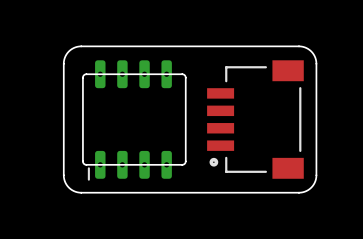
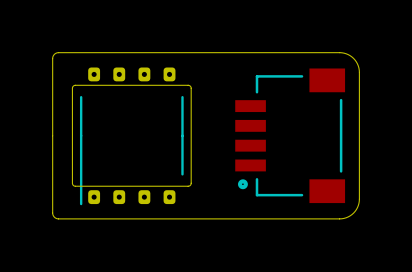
board edge: (81, 46) (73, 48) (66, 54) (63, 61) (63, 77) -> (92, 52) (57, 52) (52, 58) (52, 214) (57, 218) (92, 218)
part: none -> (131, 136)
part: (134, 120) -> none
board edge: (63, 161) (63, 177) (66, 184) (71, 190) (81, 192) -> (72, 183) (75, 186) (190, 185) (191, 88) (188, 85) (75, 85) (72, 88)

